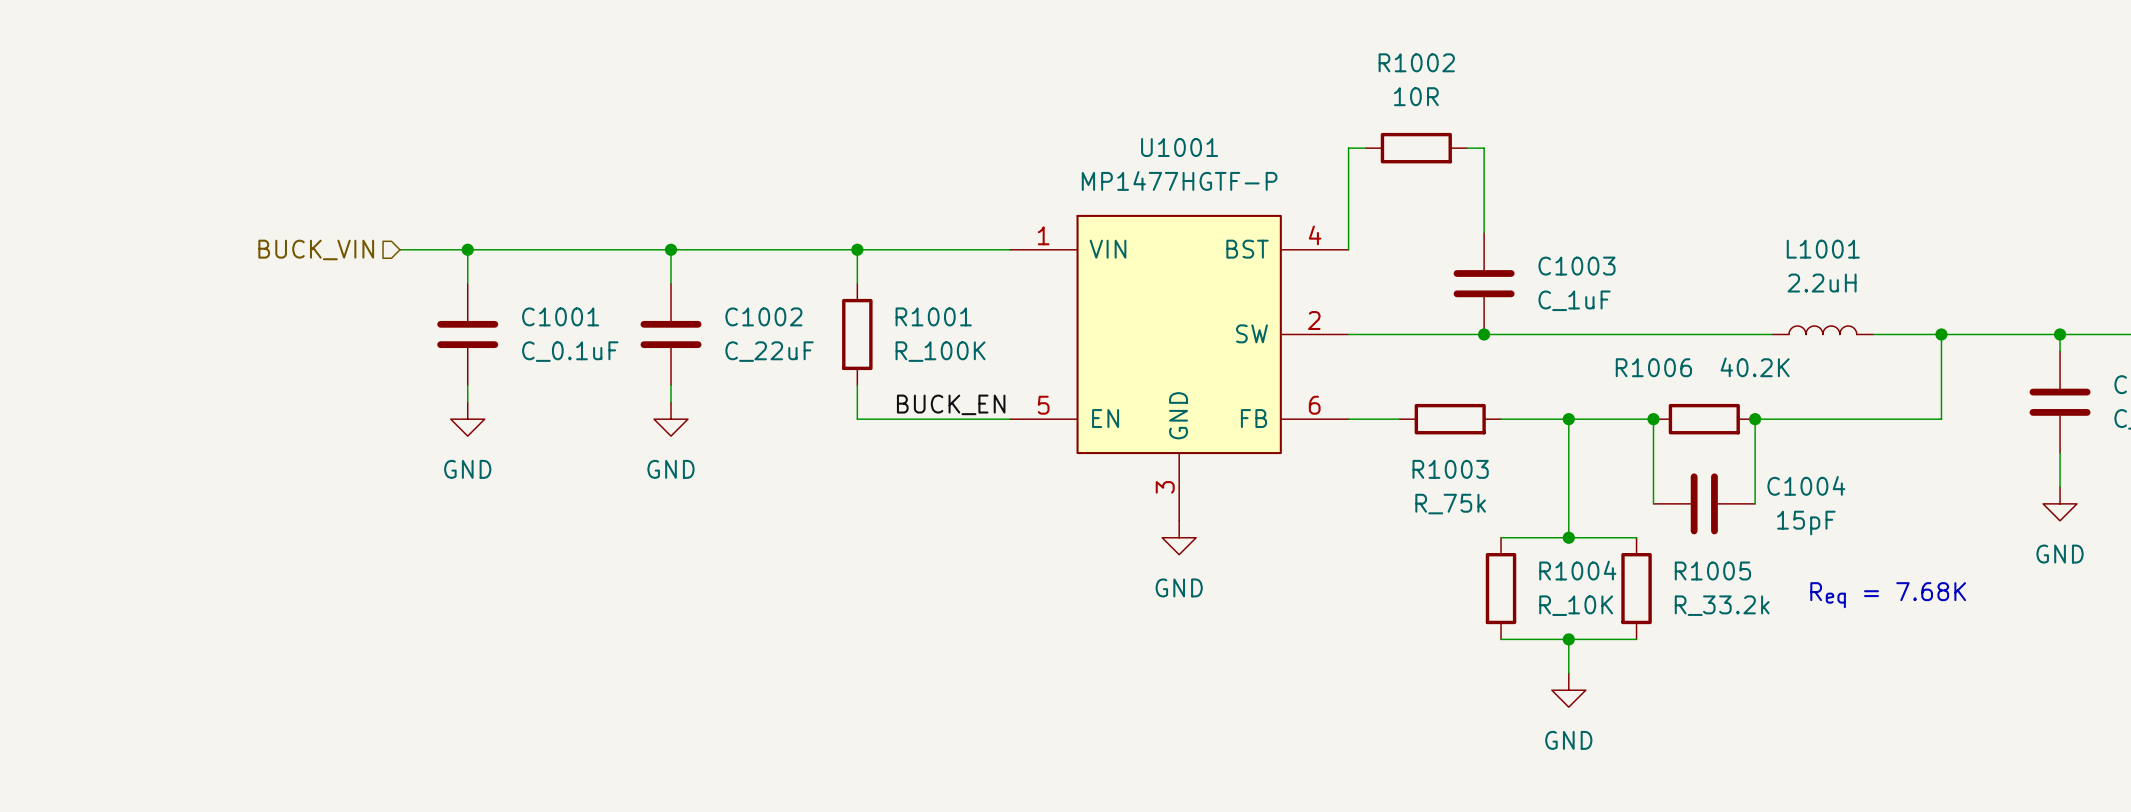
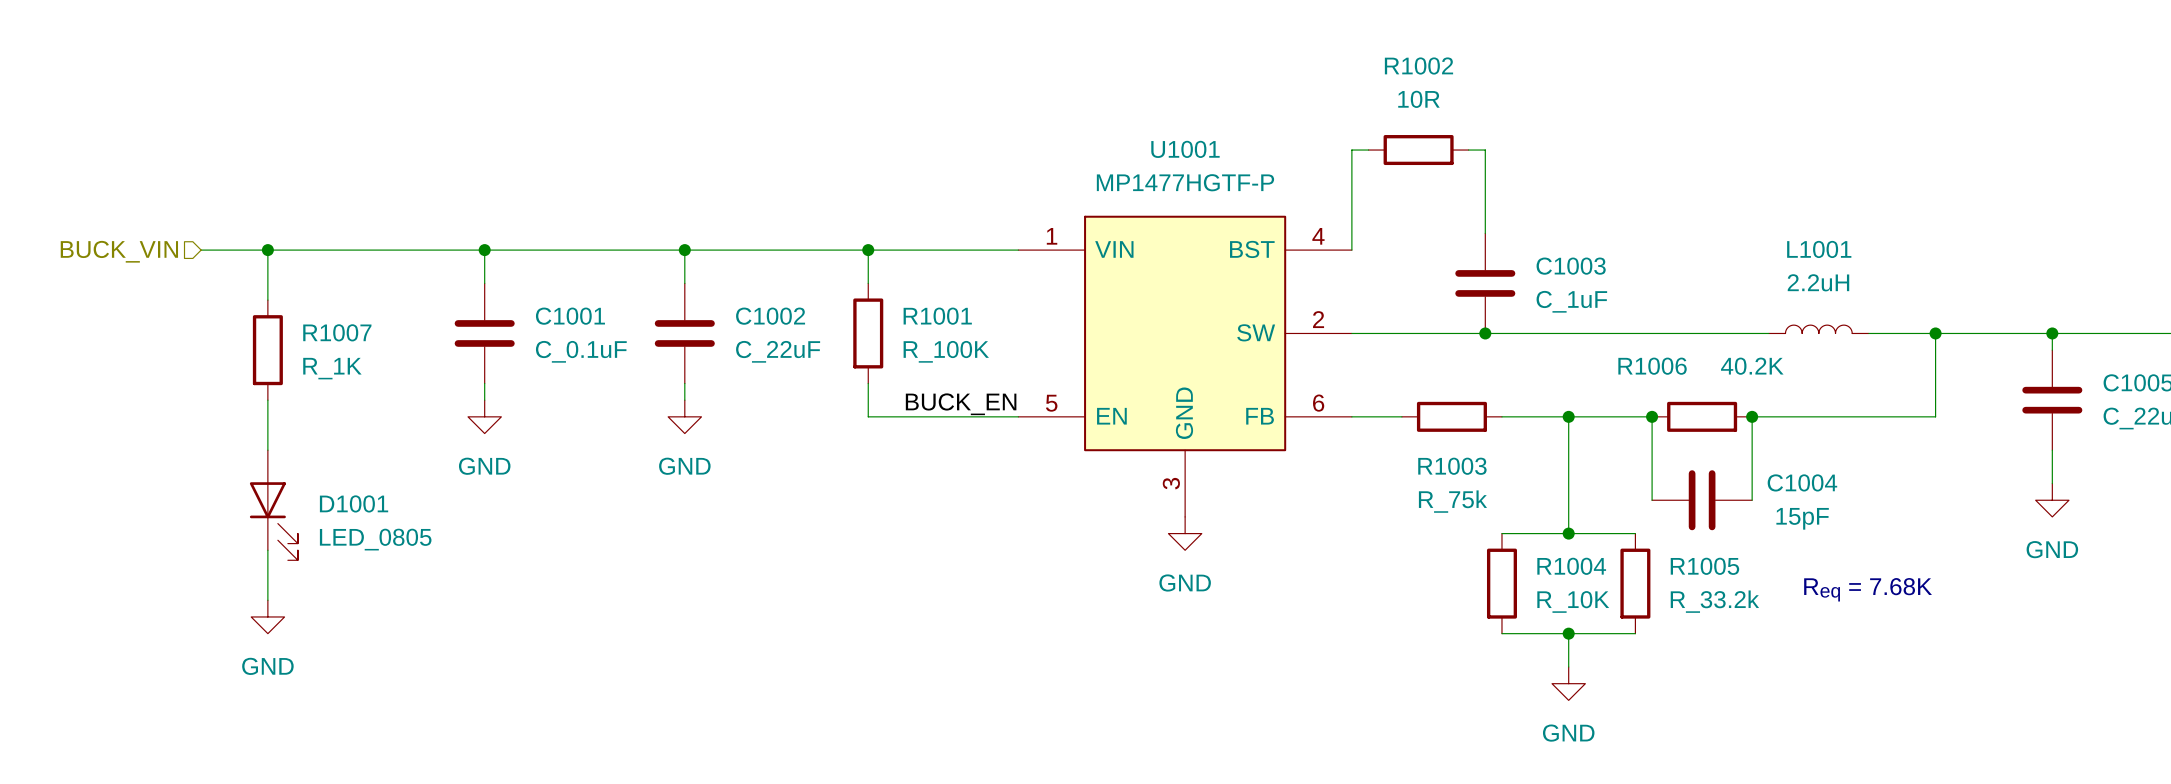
wire: none -> (201, 250) (417, 250)
wire: none -> (267, 250) (267, 300)
junction: none -> (267, 250)
hierarchical label position: BUCK_VIN (316, 249) -> BUCK_VIN (119, 251)
R1007: none -> R_1K (267, 350)
wire: none -> (267, 400) (267, 450)
D1001: none -> LED_0805 (273, 505)
wire: none -> (267, 550) (267, 600)
power symbol: none -> GND (267, 616)

